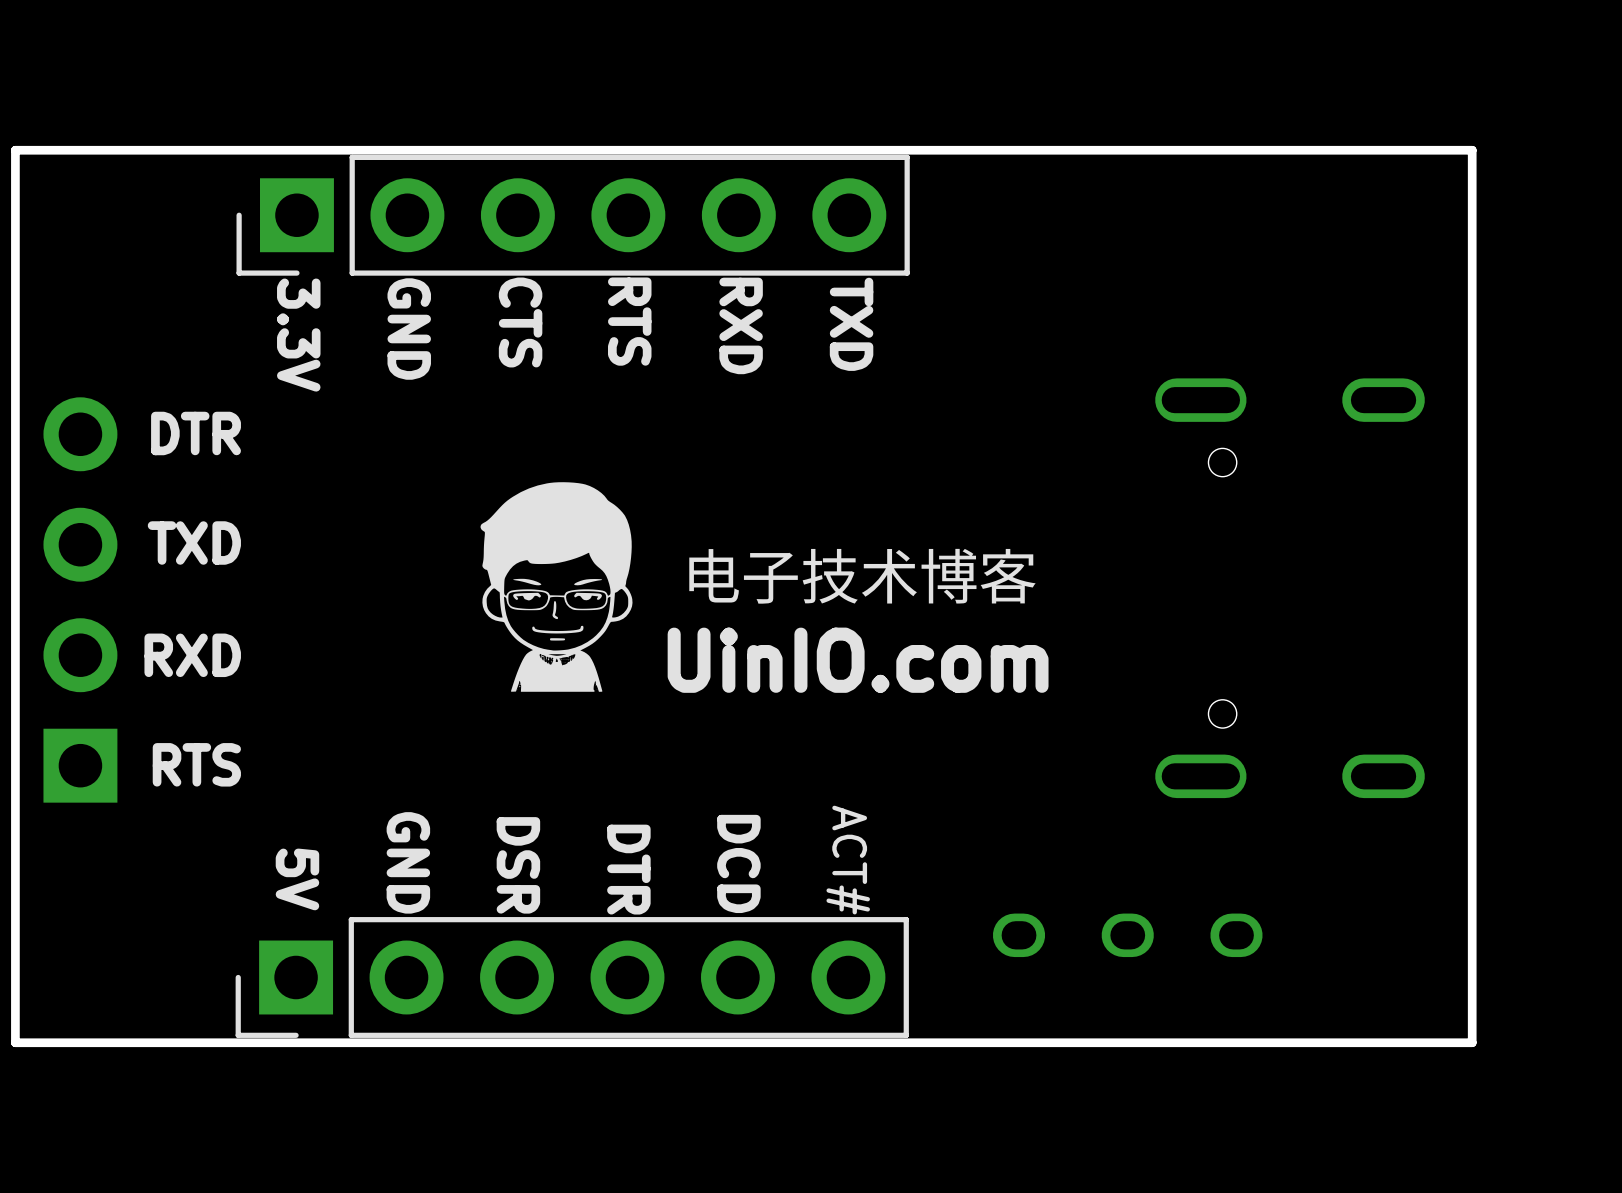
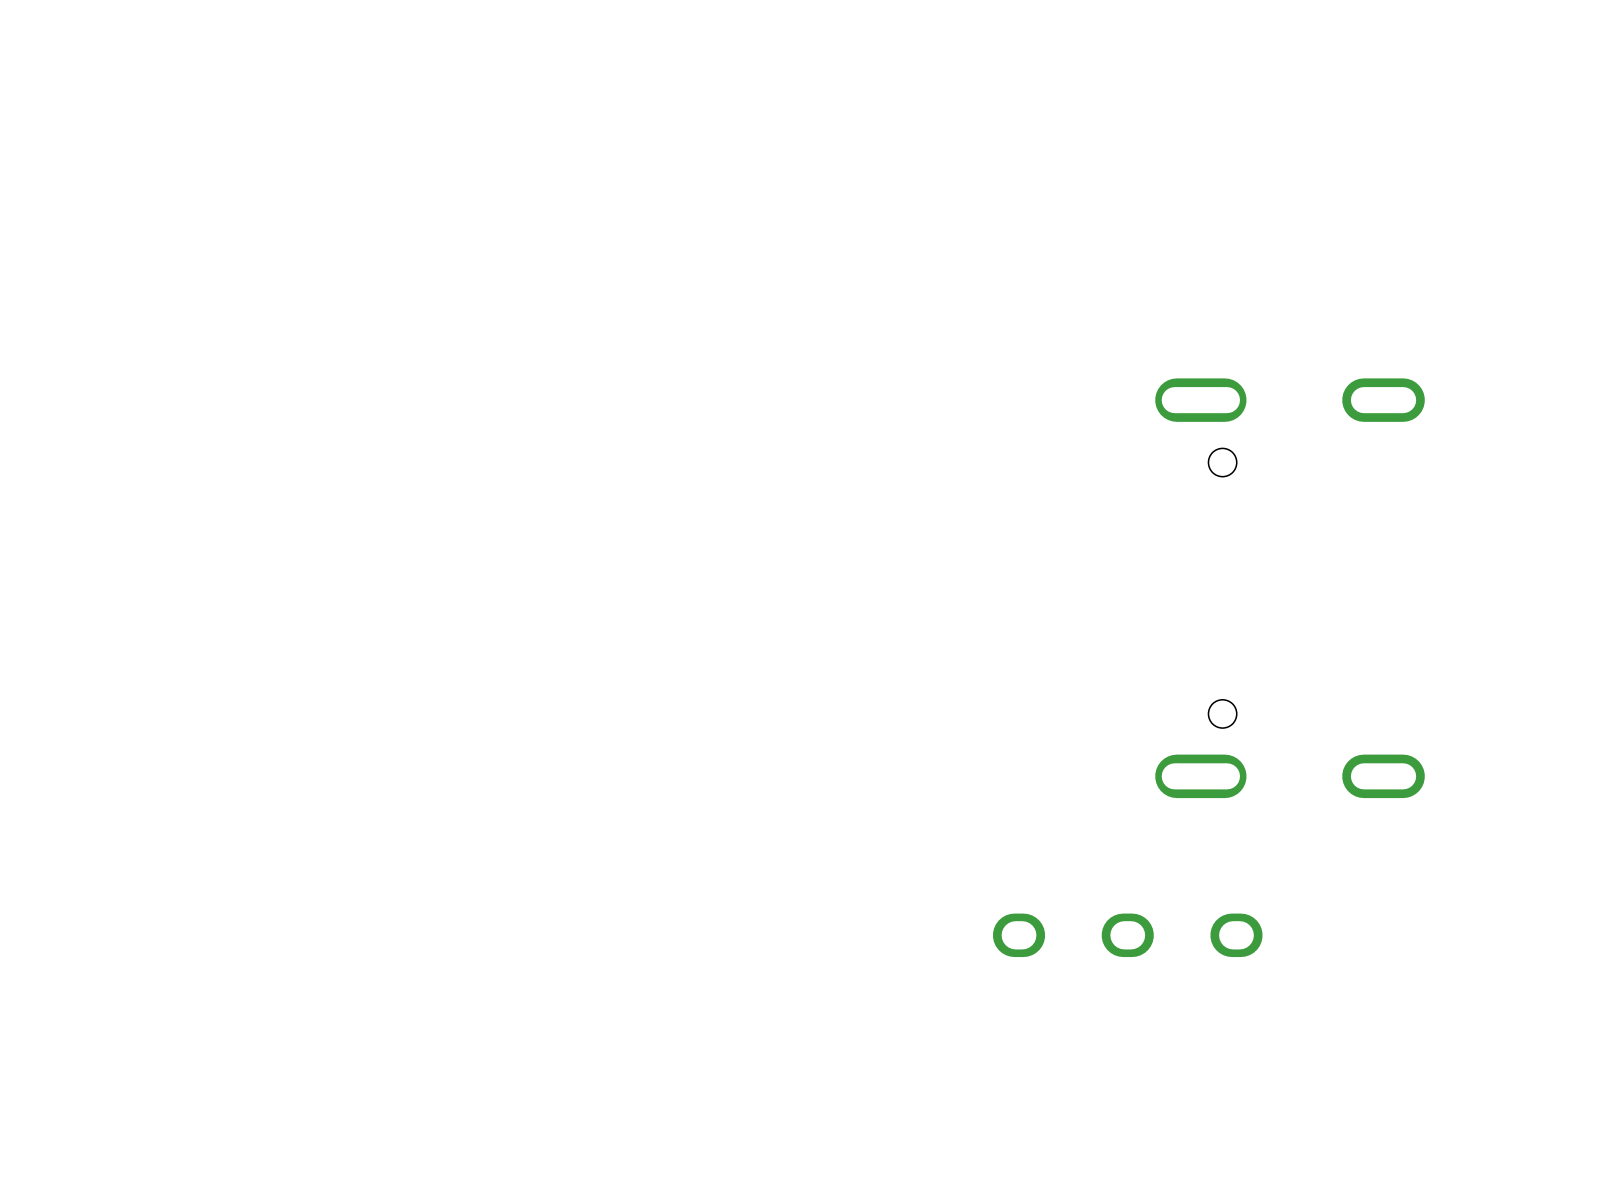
board edge: (1472, 150) (15, 150) (15, 1042) (1472, 1042) (1472, 150) -> none
part: (573, 215) -> none
text: RTS (629, 321) -> none
text: CTS (520, 322) -> none
text: TXD (851, 324) -> none
text: RXD (741, 325) -> none
text: GND (409, 329) -> none
text: 3.3V (298, 335) -> none
text: DTR (196, 433) -> none
drawing: [480, 482, 633, 692] -> none
text: TXD (194, 543) -> none
text: 电子技术博客 (862, 576) -> none
part: (80, 599) -> none
text: RXD (192, 655) -> none
text: UinIO.com (858, 660) -> none
text: RTS (196, 764) -> none
text: ACT# (848, 860) -> none
text: GND (408, 862) -> none
text: DCD (738, 863) -> none
text: DSR (518, 865) -> none
text: DTR (628, 869) -> none
text: 5V (297, 879) -> none
part: (572, 977) -> none

